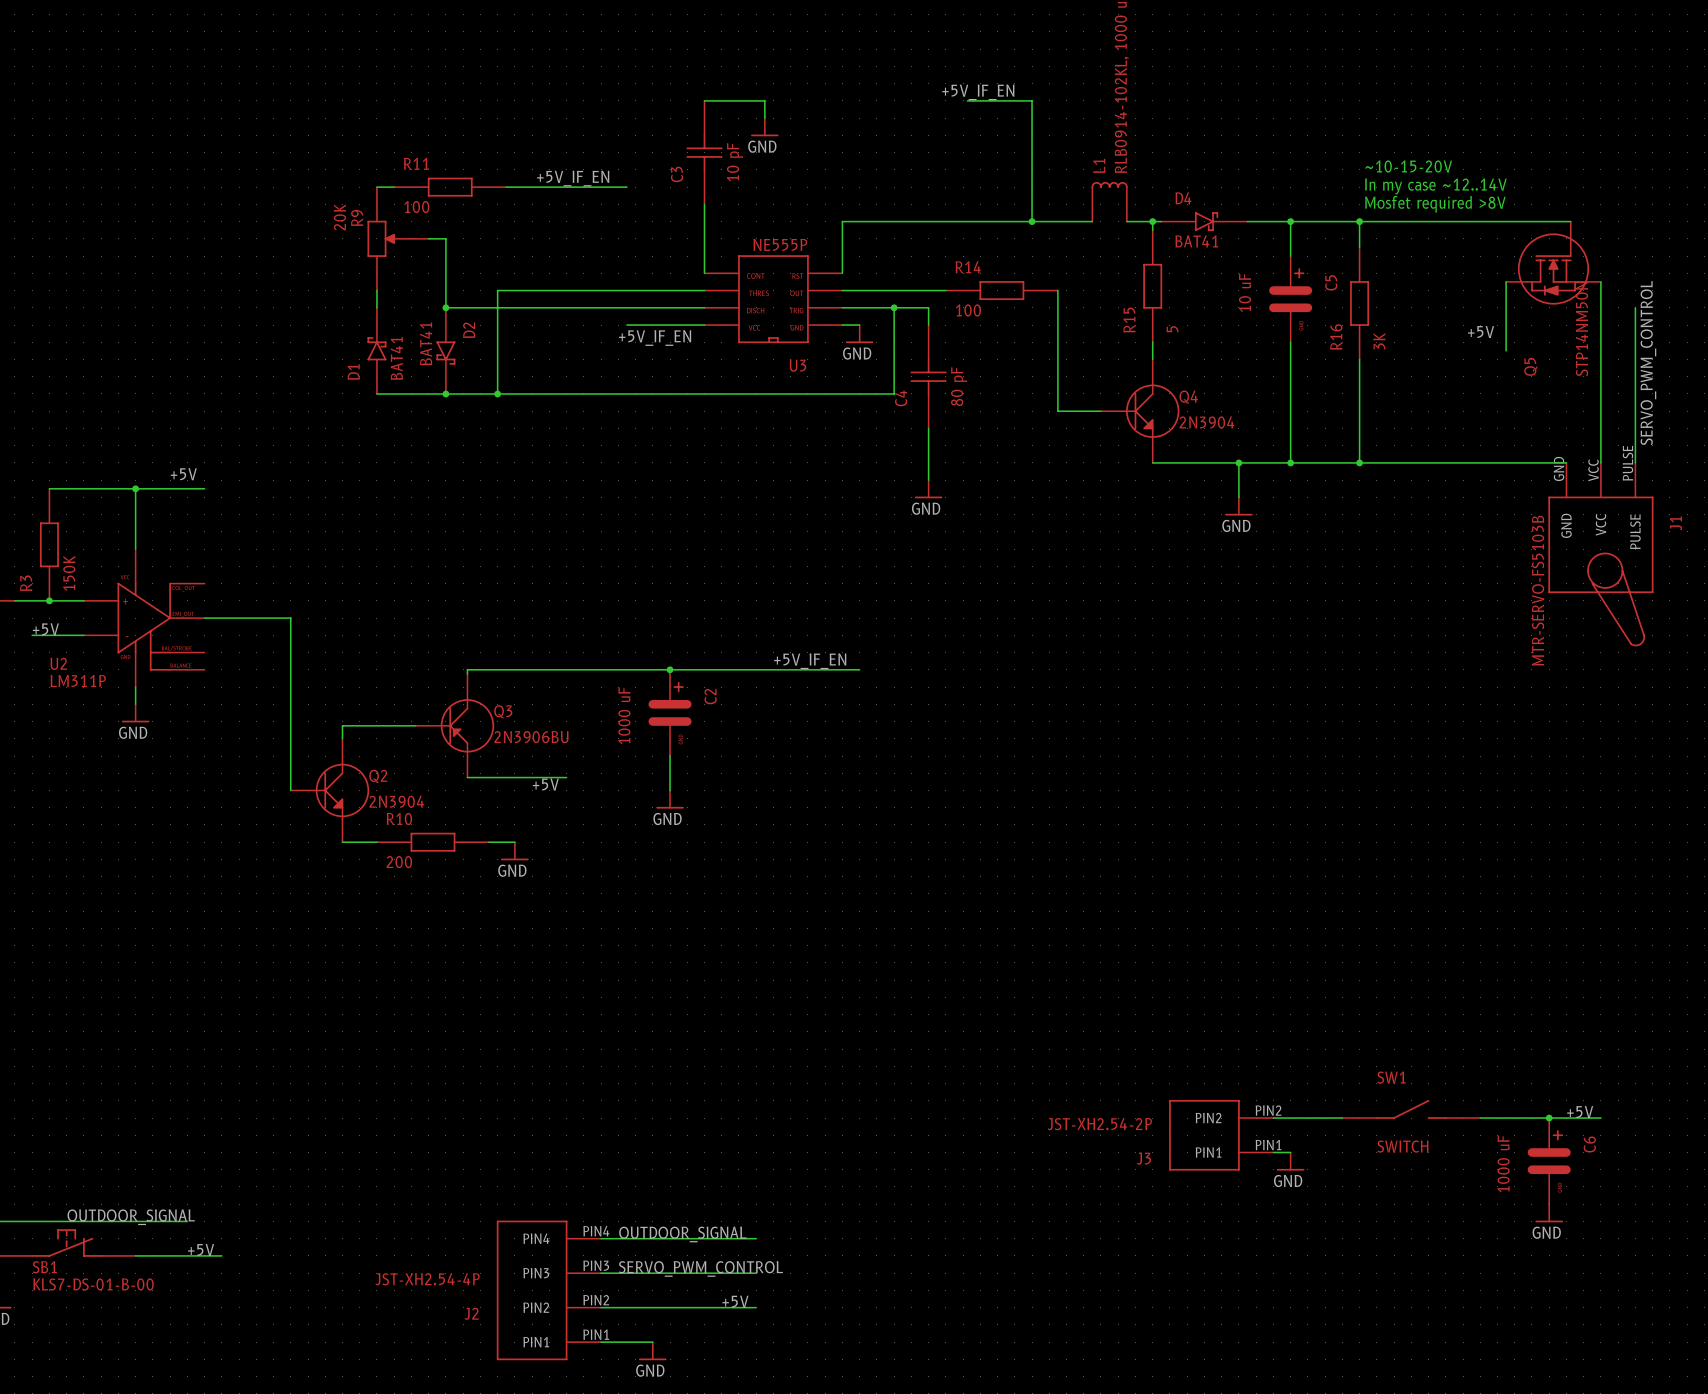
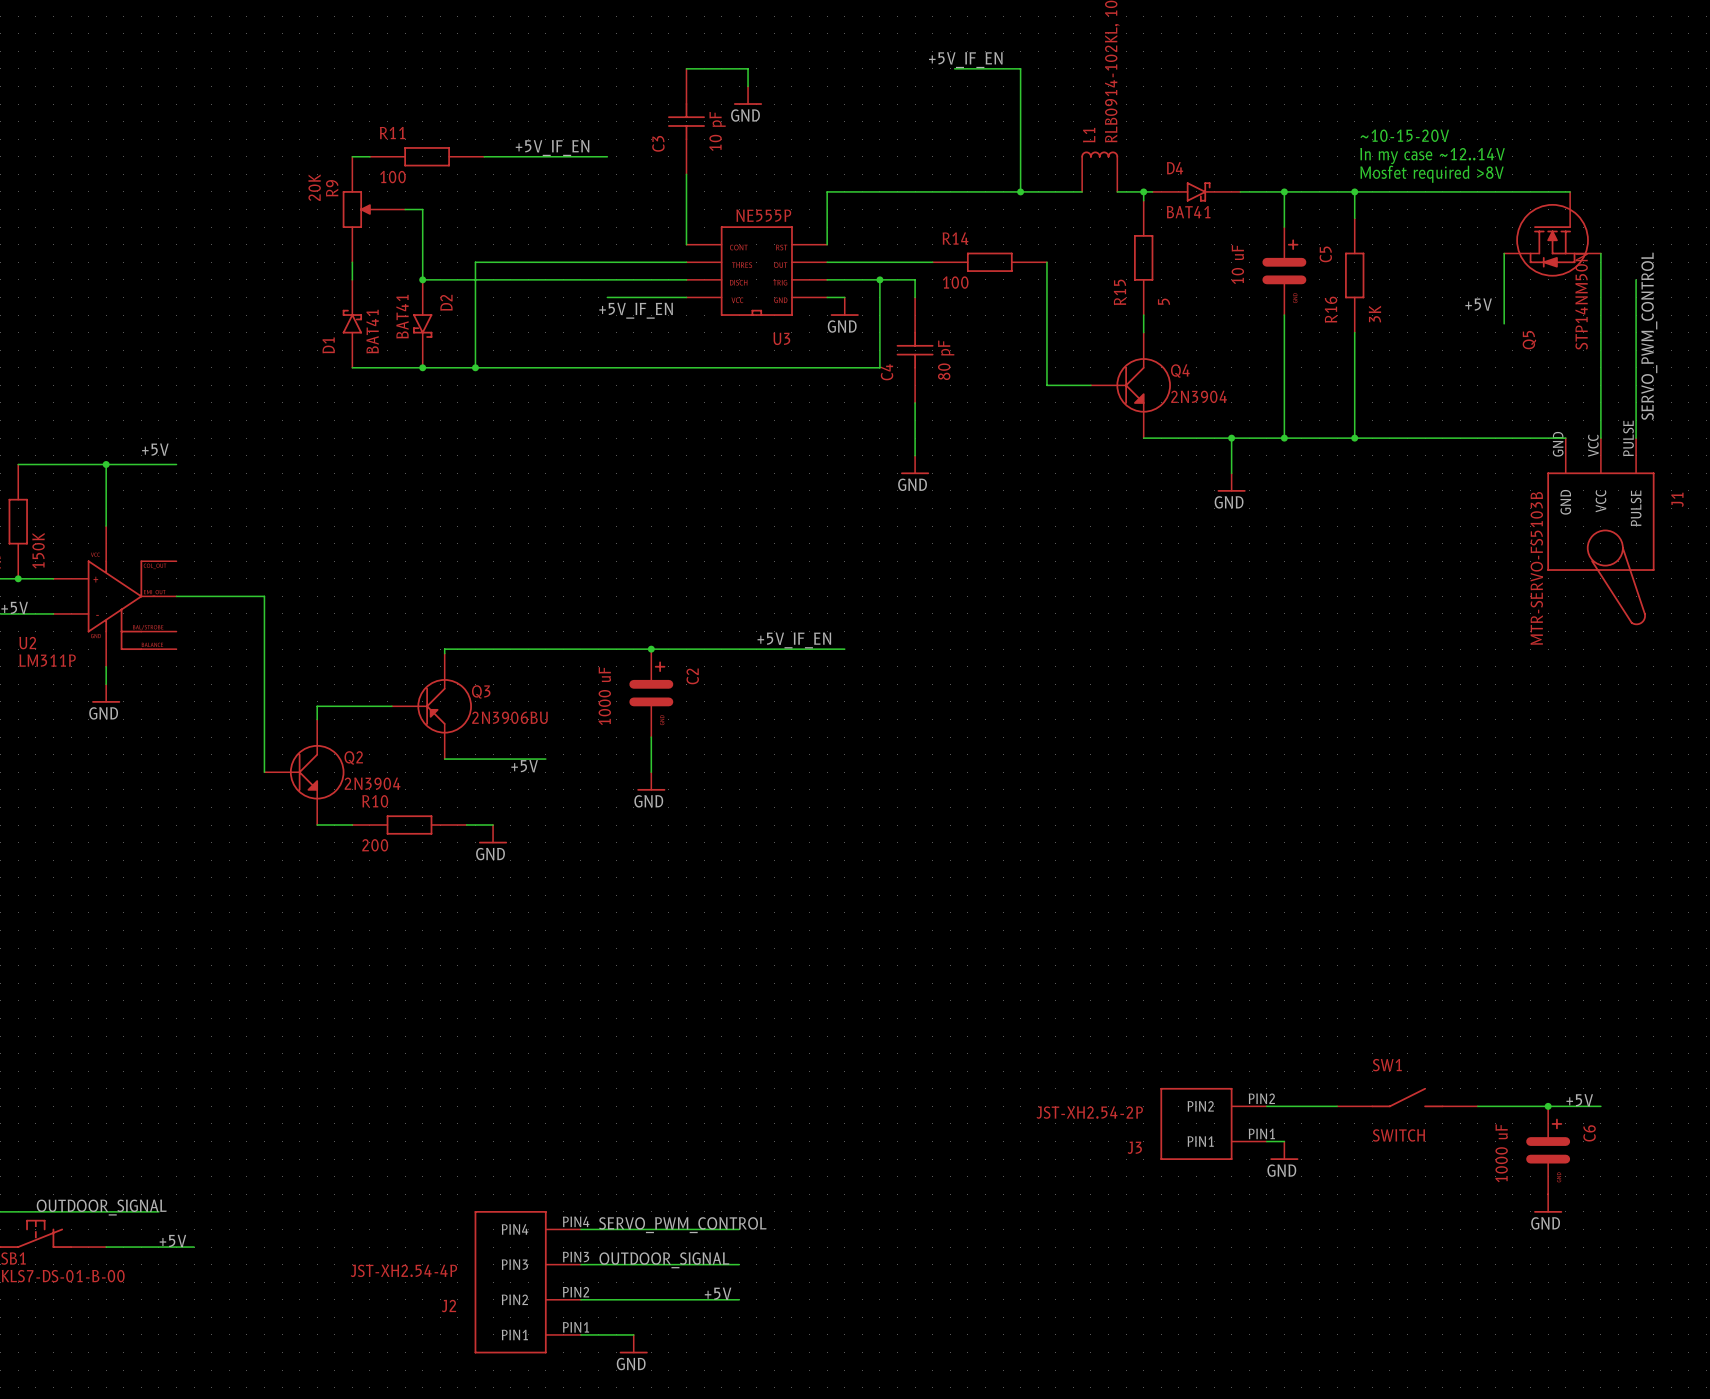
label: OUTDOOR_SIGNAL (682, 1234) -> SERVO_PWM_CONTROL (682, 1225)
label: SERVO_PWM_CONTROL (700, 1268) -> OUTDOOR_SIGNAL (664, 1260)

